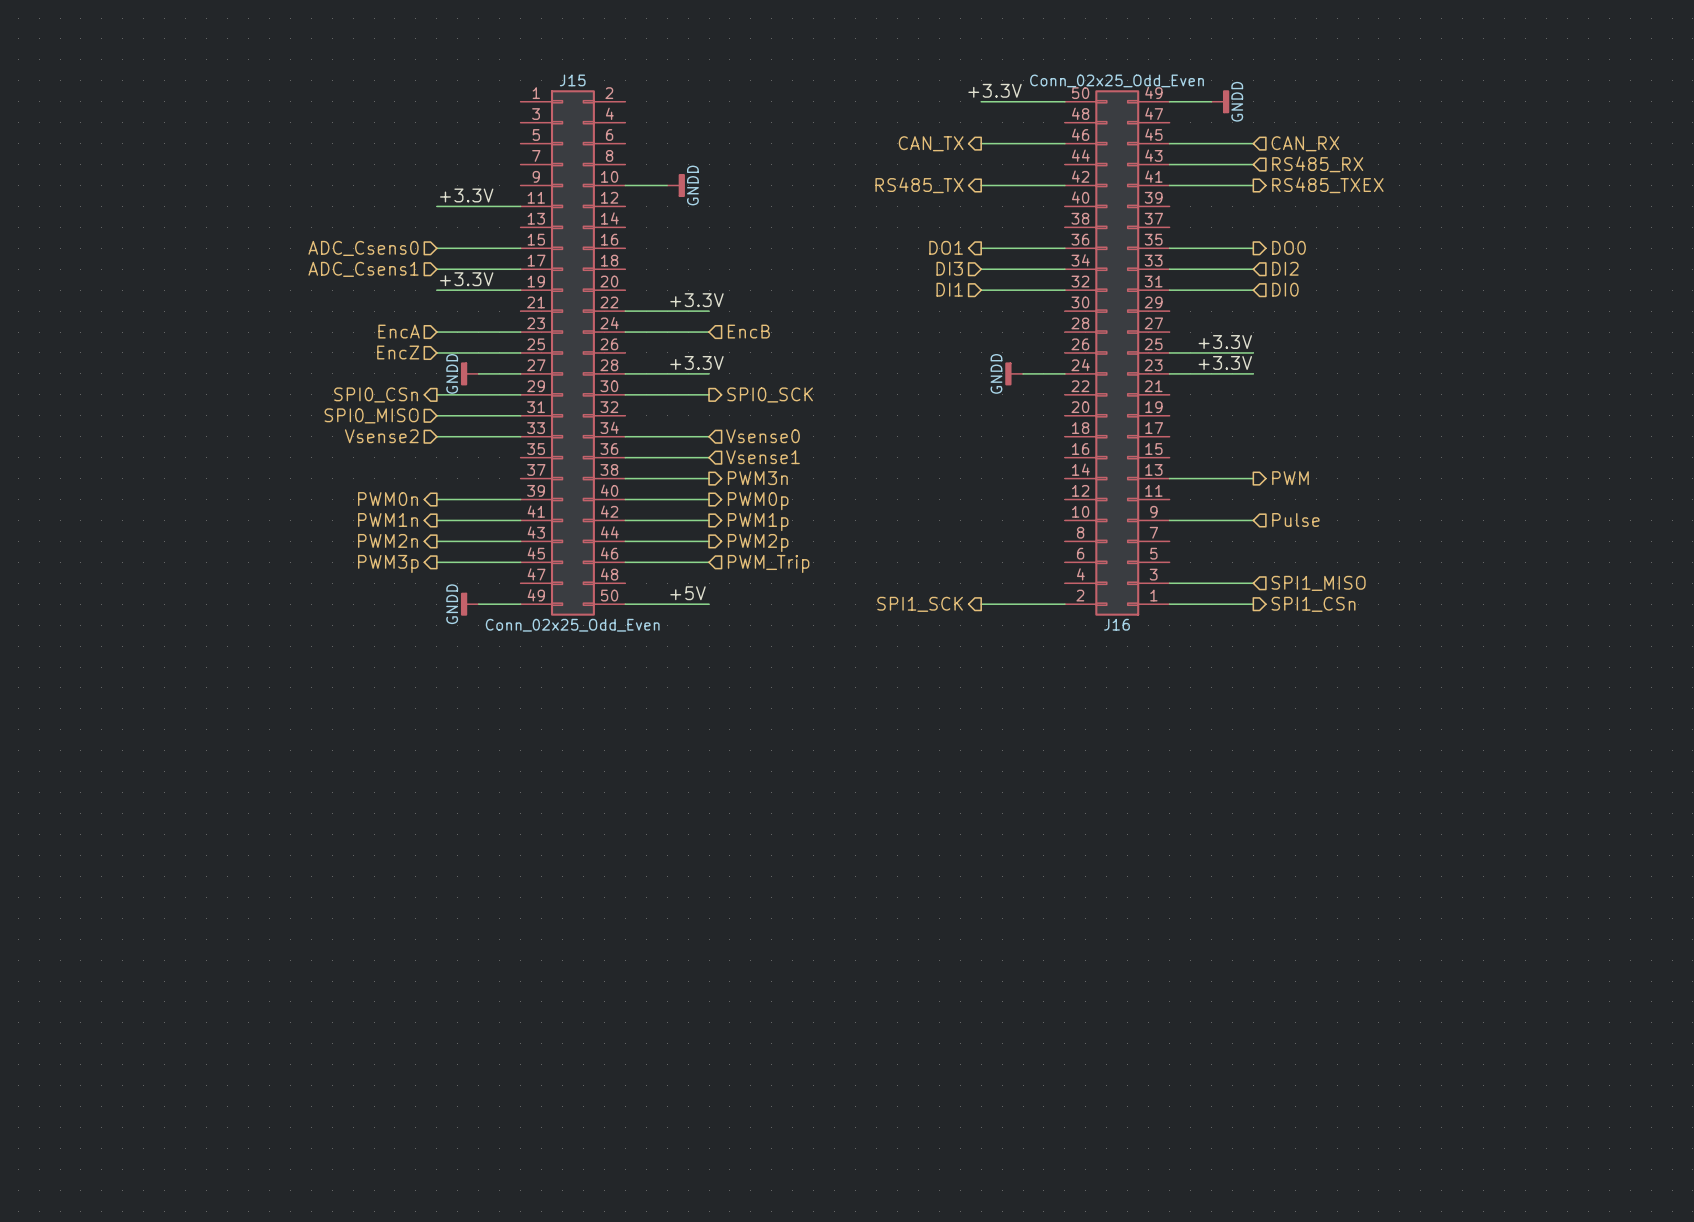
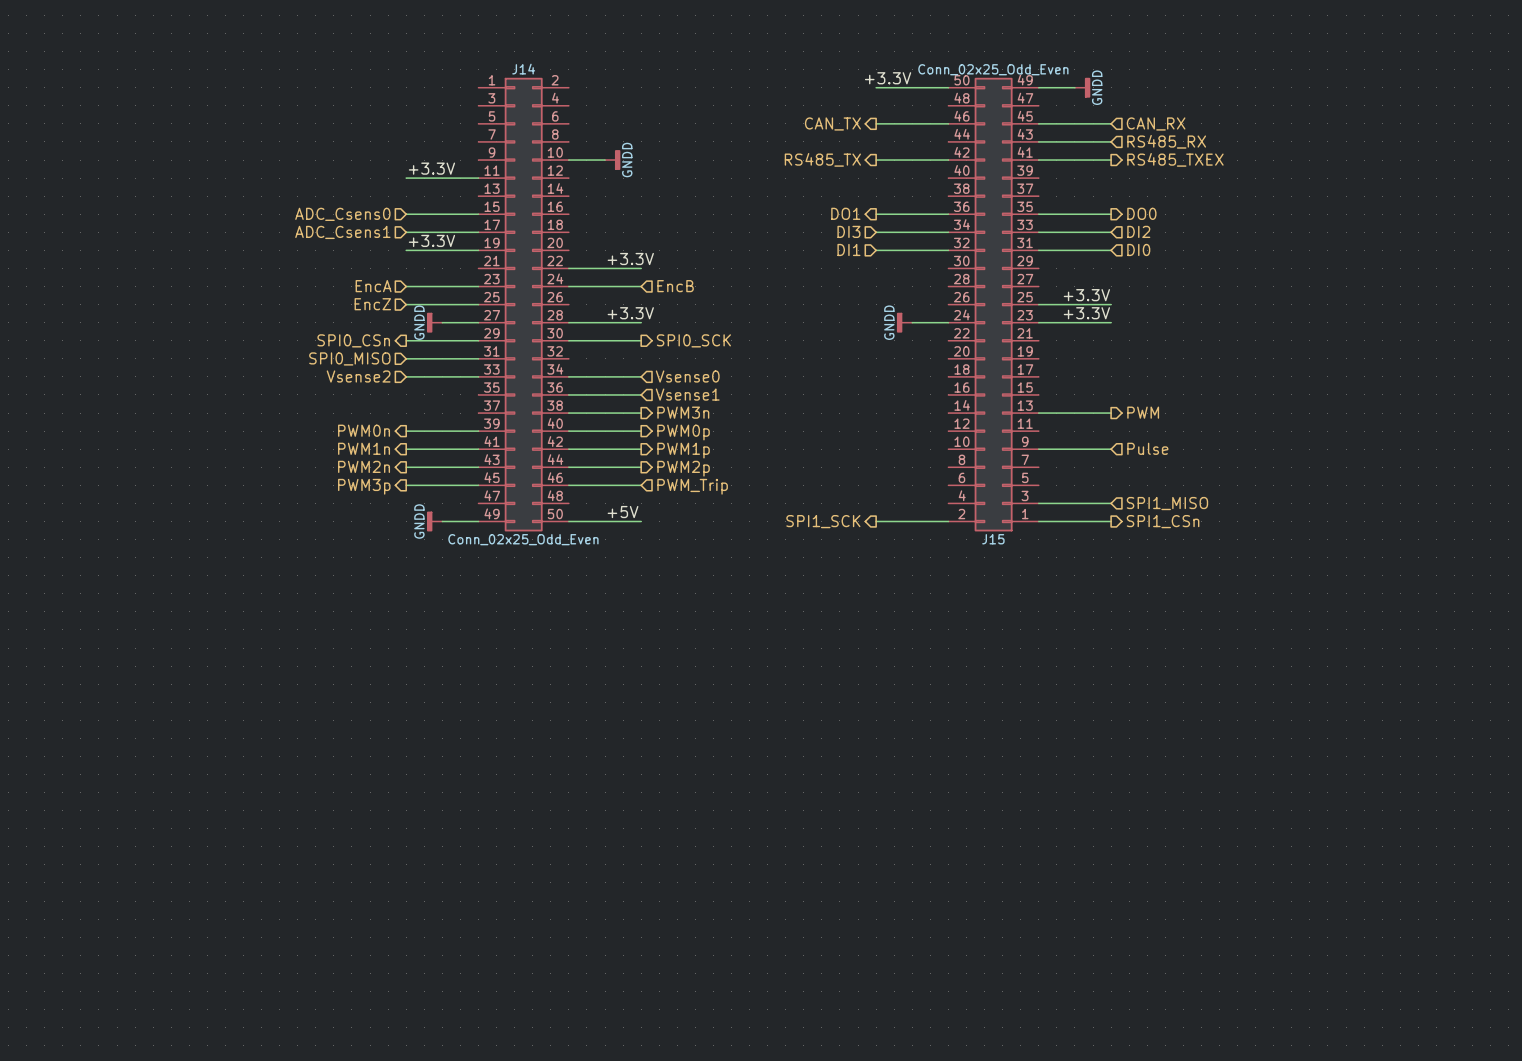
J15 name: J15 (572, 80) -> J14 (523, 69)
J16 name: J16 (1117, 624) -> J15 (993, 539)

